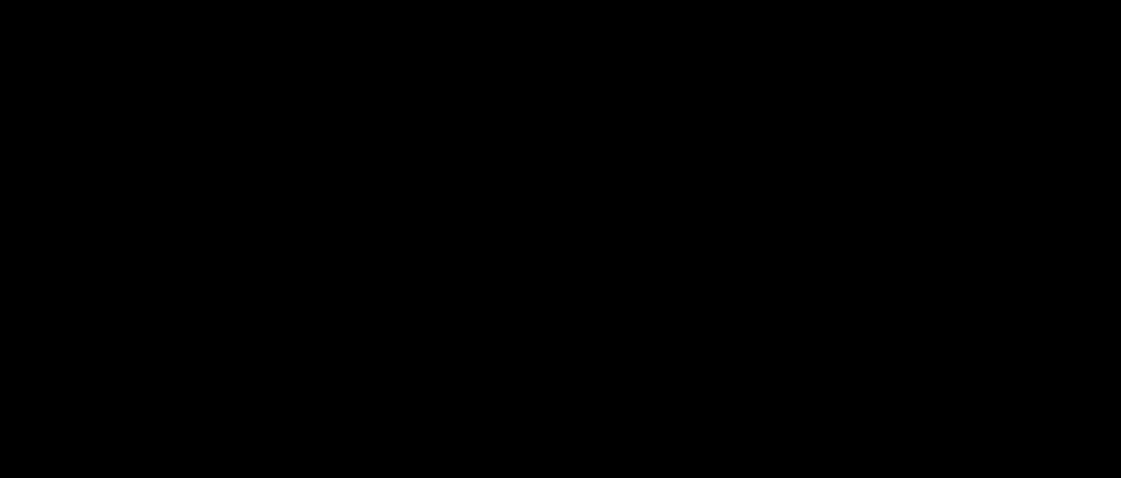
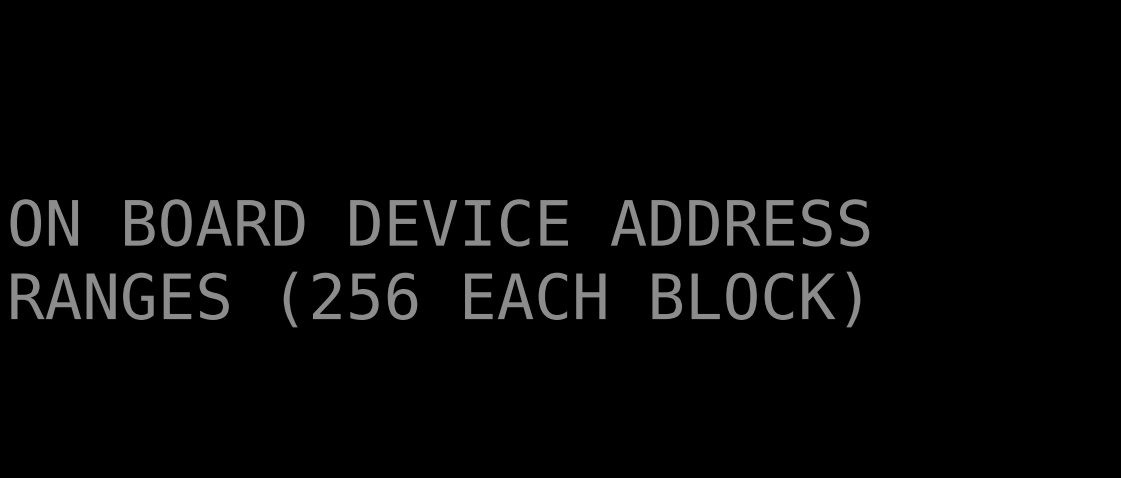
text: none -> ON BOARD DEVICE ADDRESS (439, 222)
text: none -> RANGES (256 EACH BLOCK) (435, 299)

